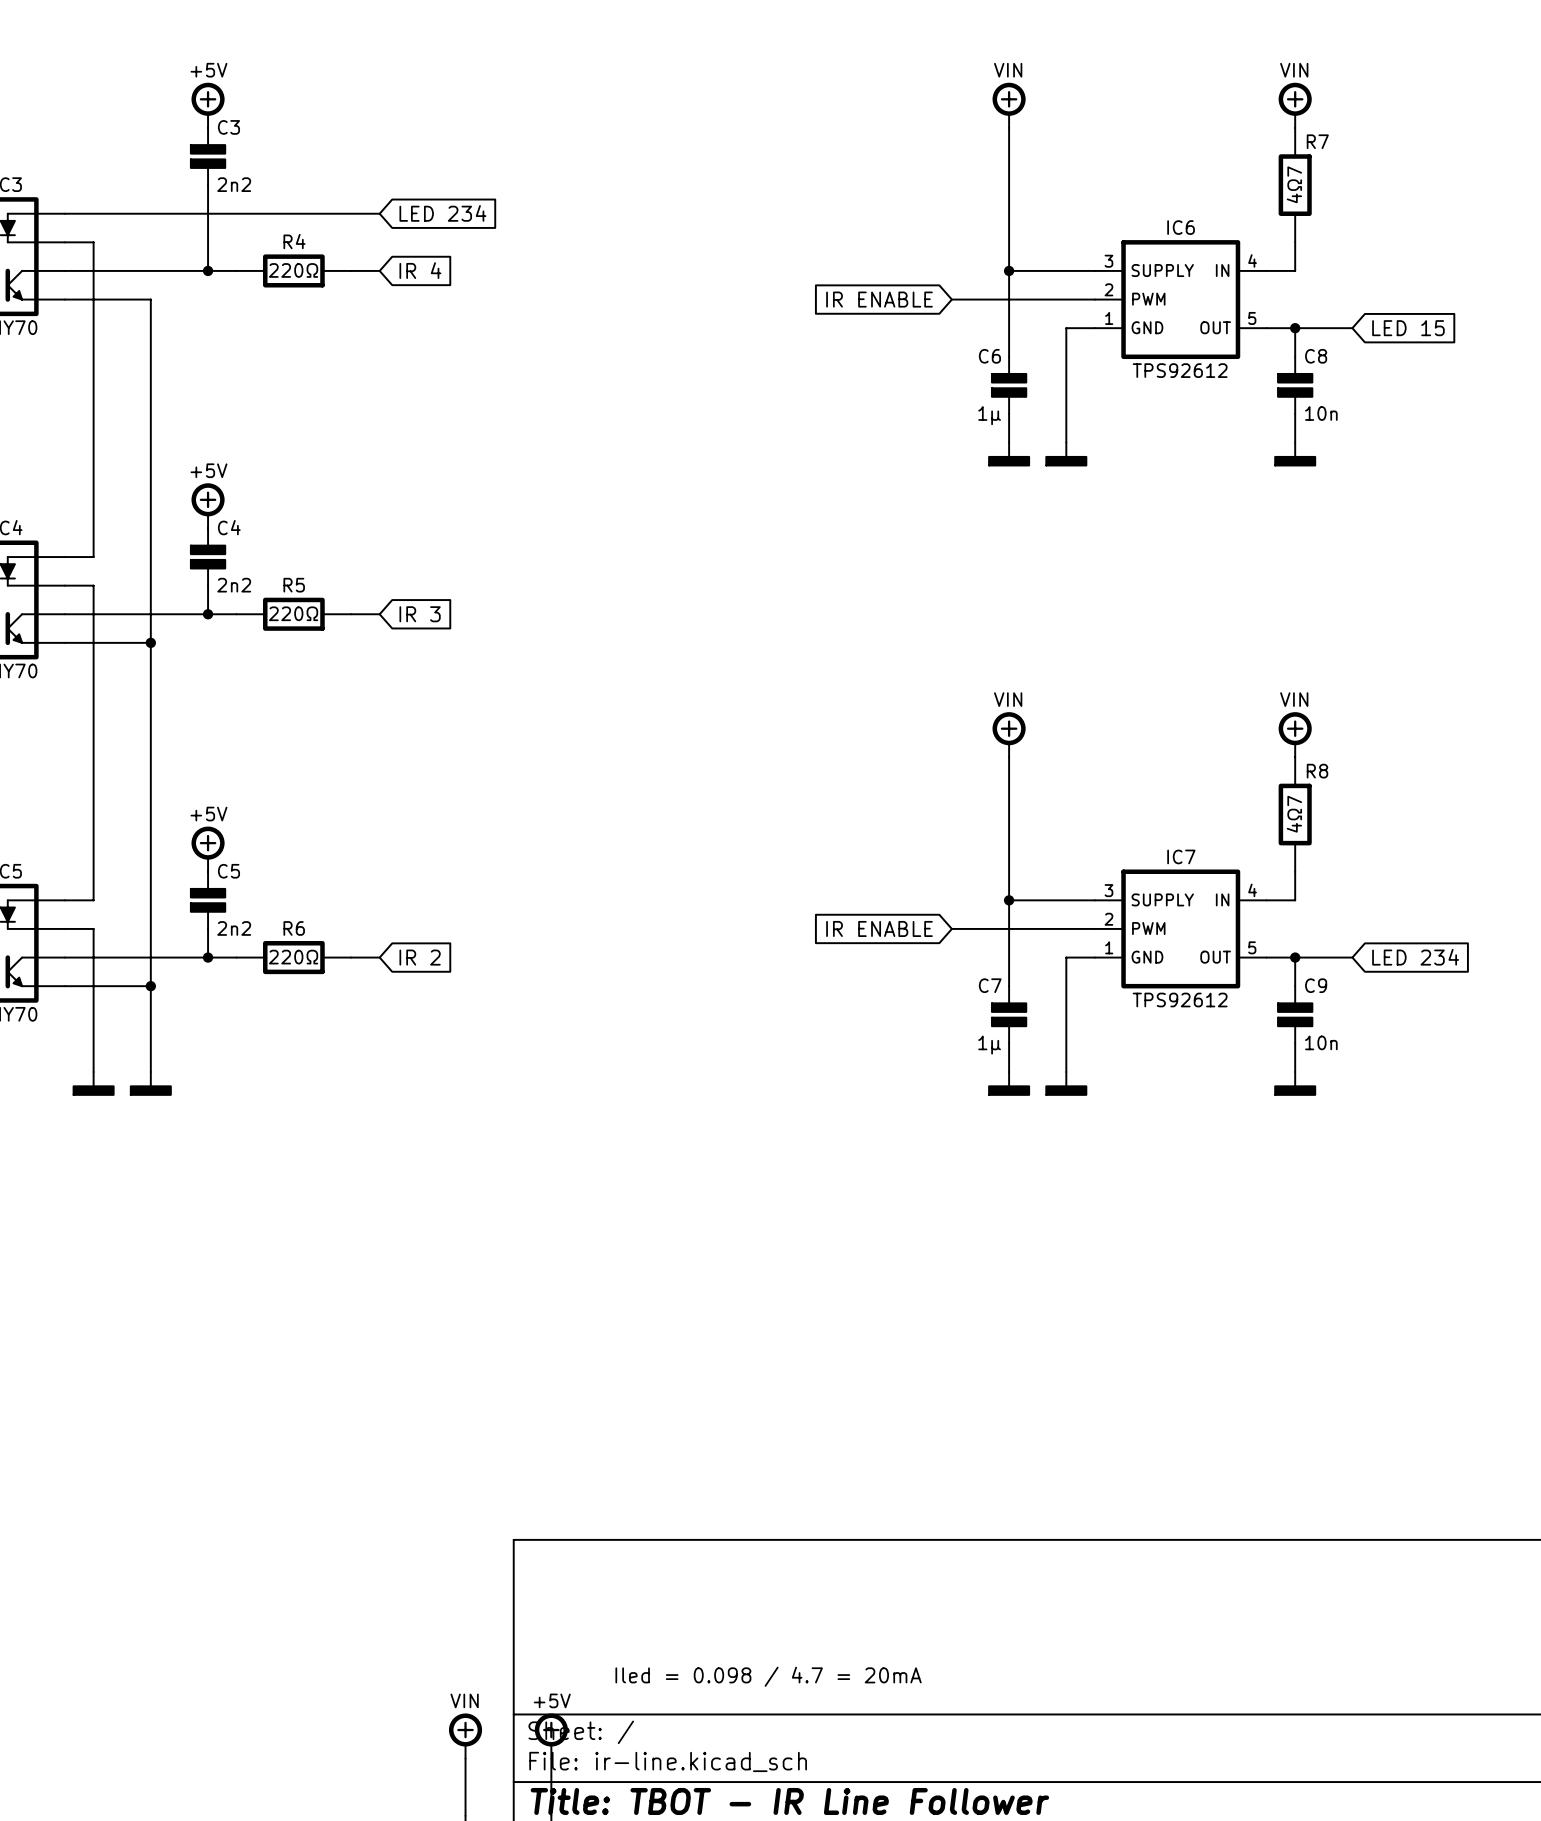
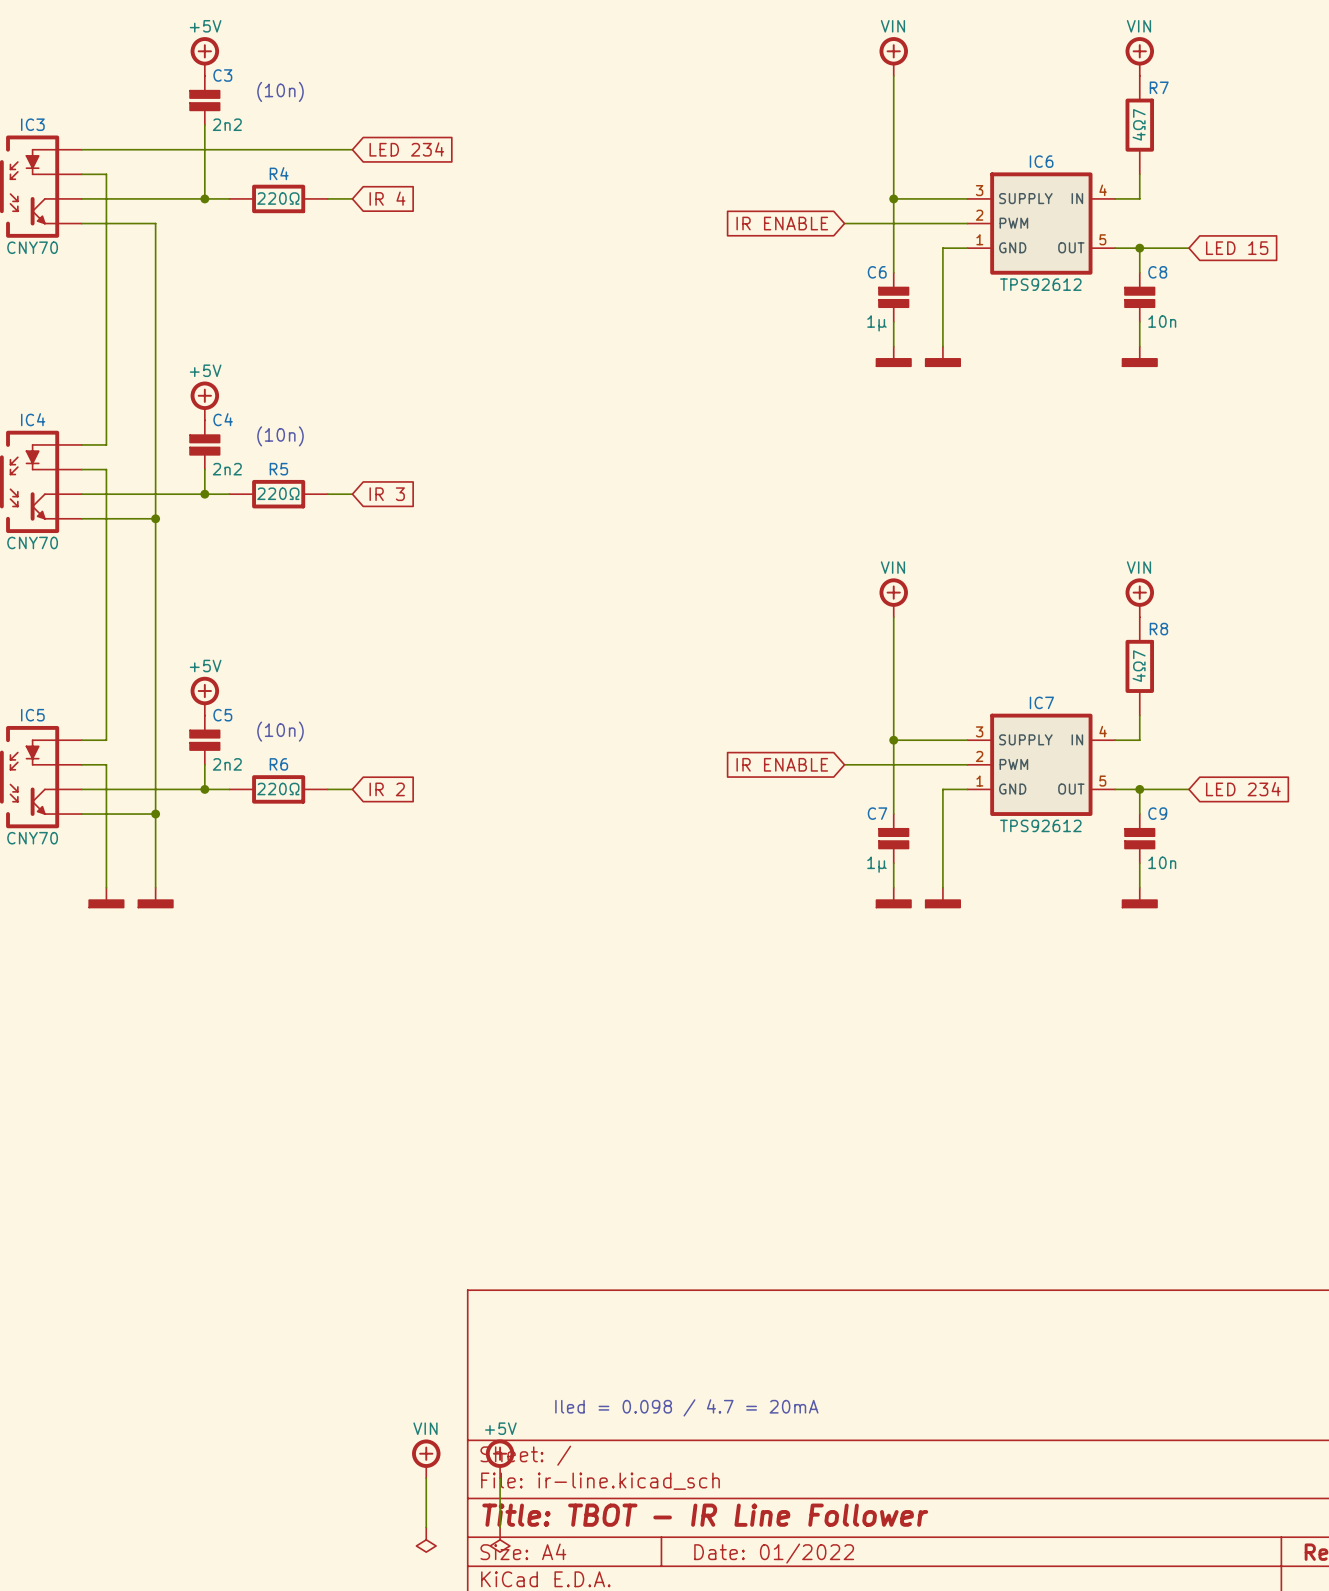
text: none -> (10n) (280, 91)
text: none -> (10n) (280, 436)
text: none -> (10n) (280, 731)

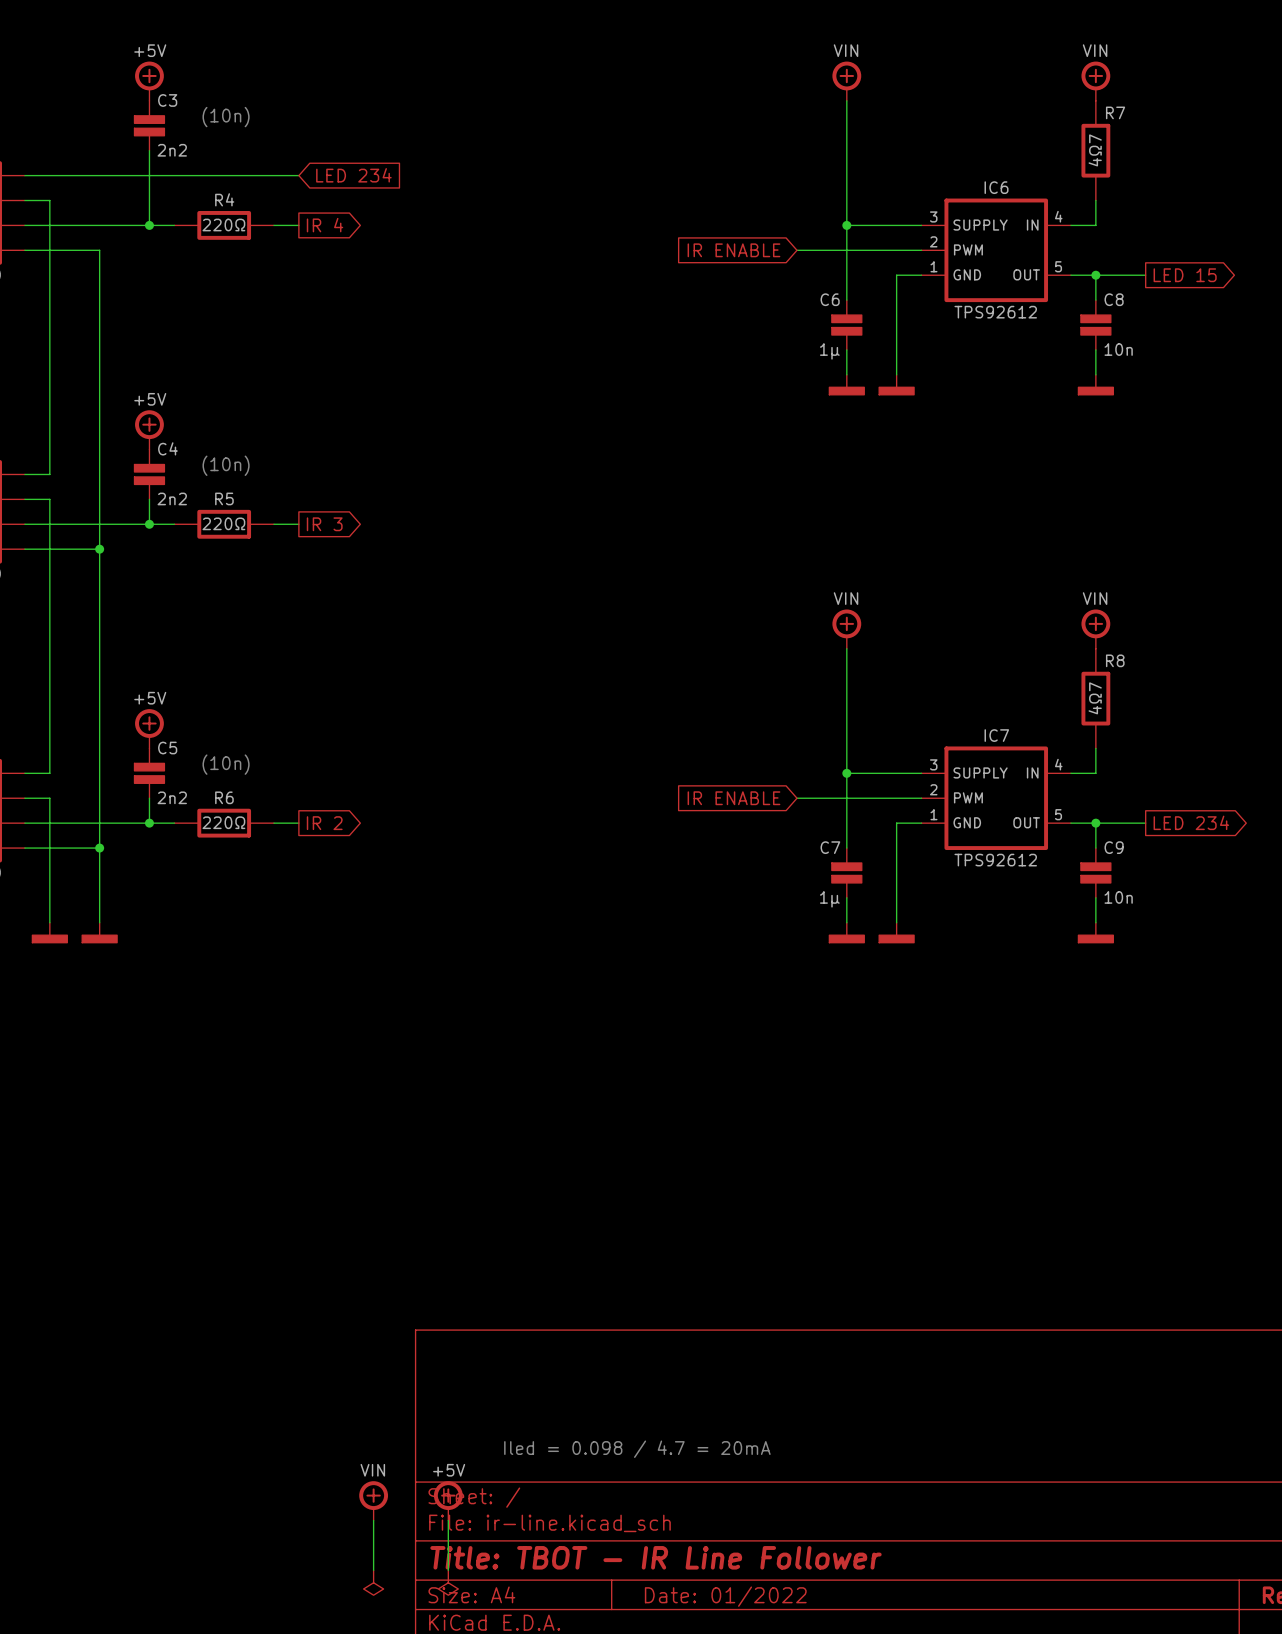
global label shape: input (387, 198) -> output (325, 225)
global label shape: input (1237, 248) -> output (1185, 275)
global label shape: input (387, 494) -> output (324, 524)
global label shape: input (387, 789) -> output (324, 823)
global label shape: input (1243, 789) -> output (1191, 822)

